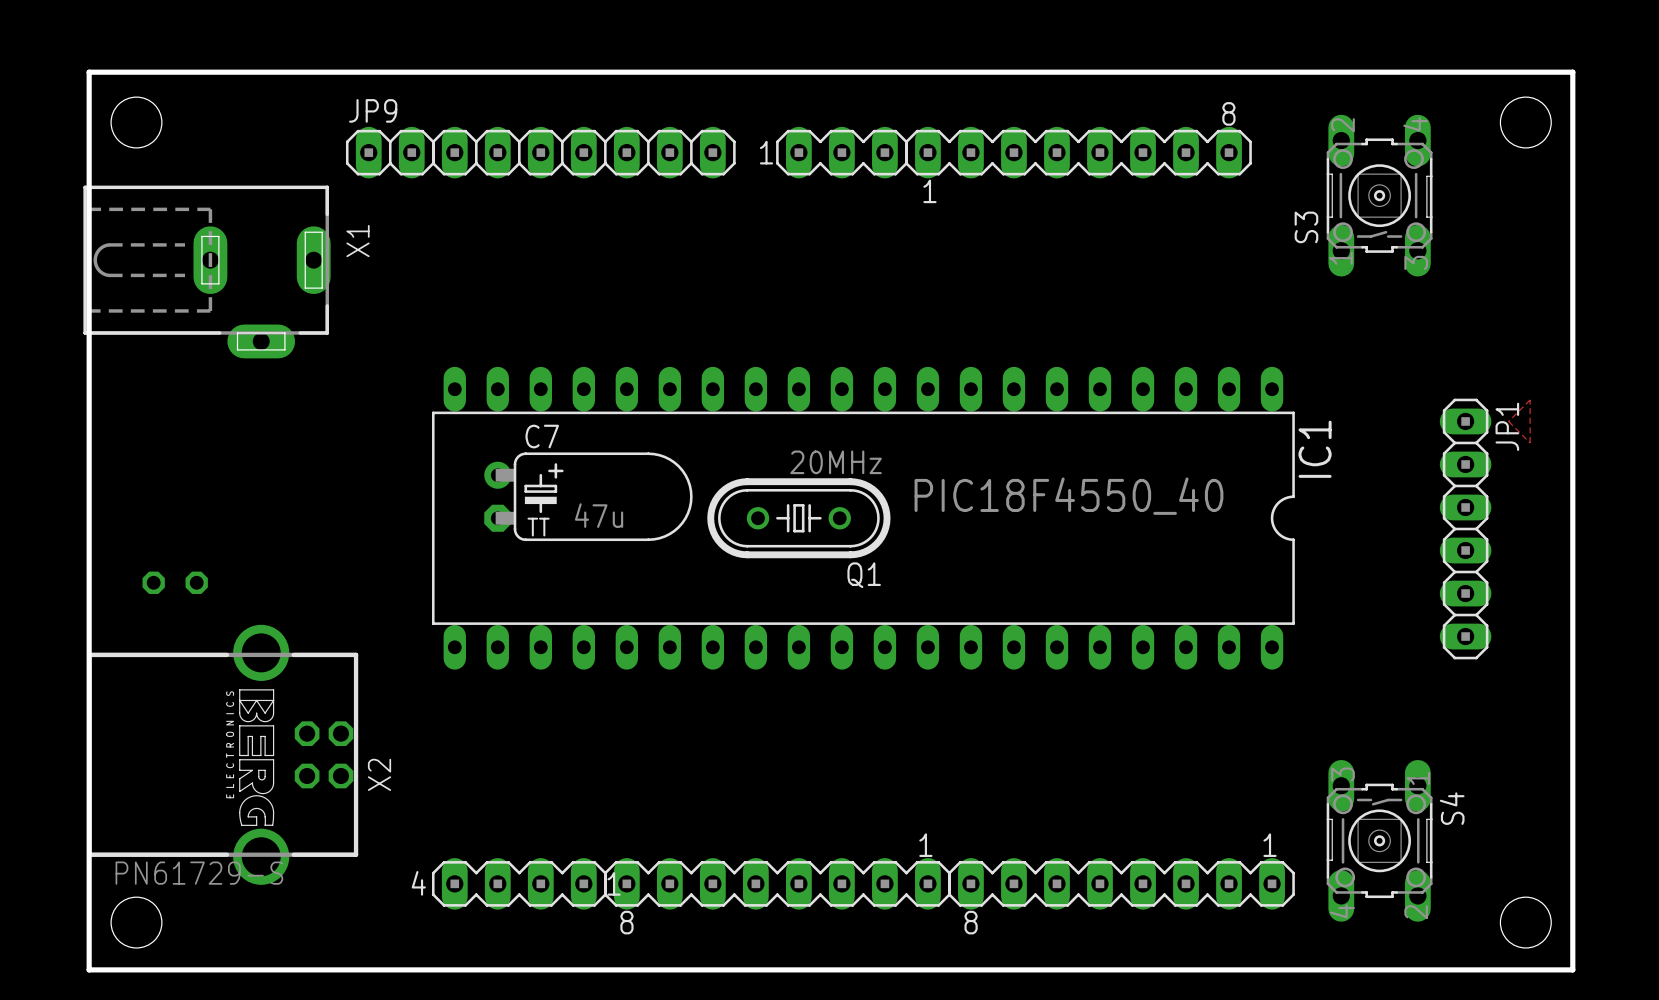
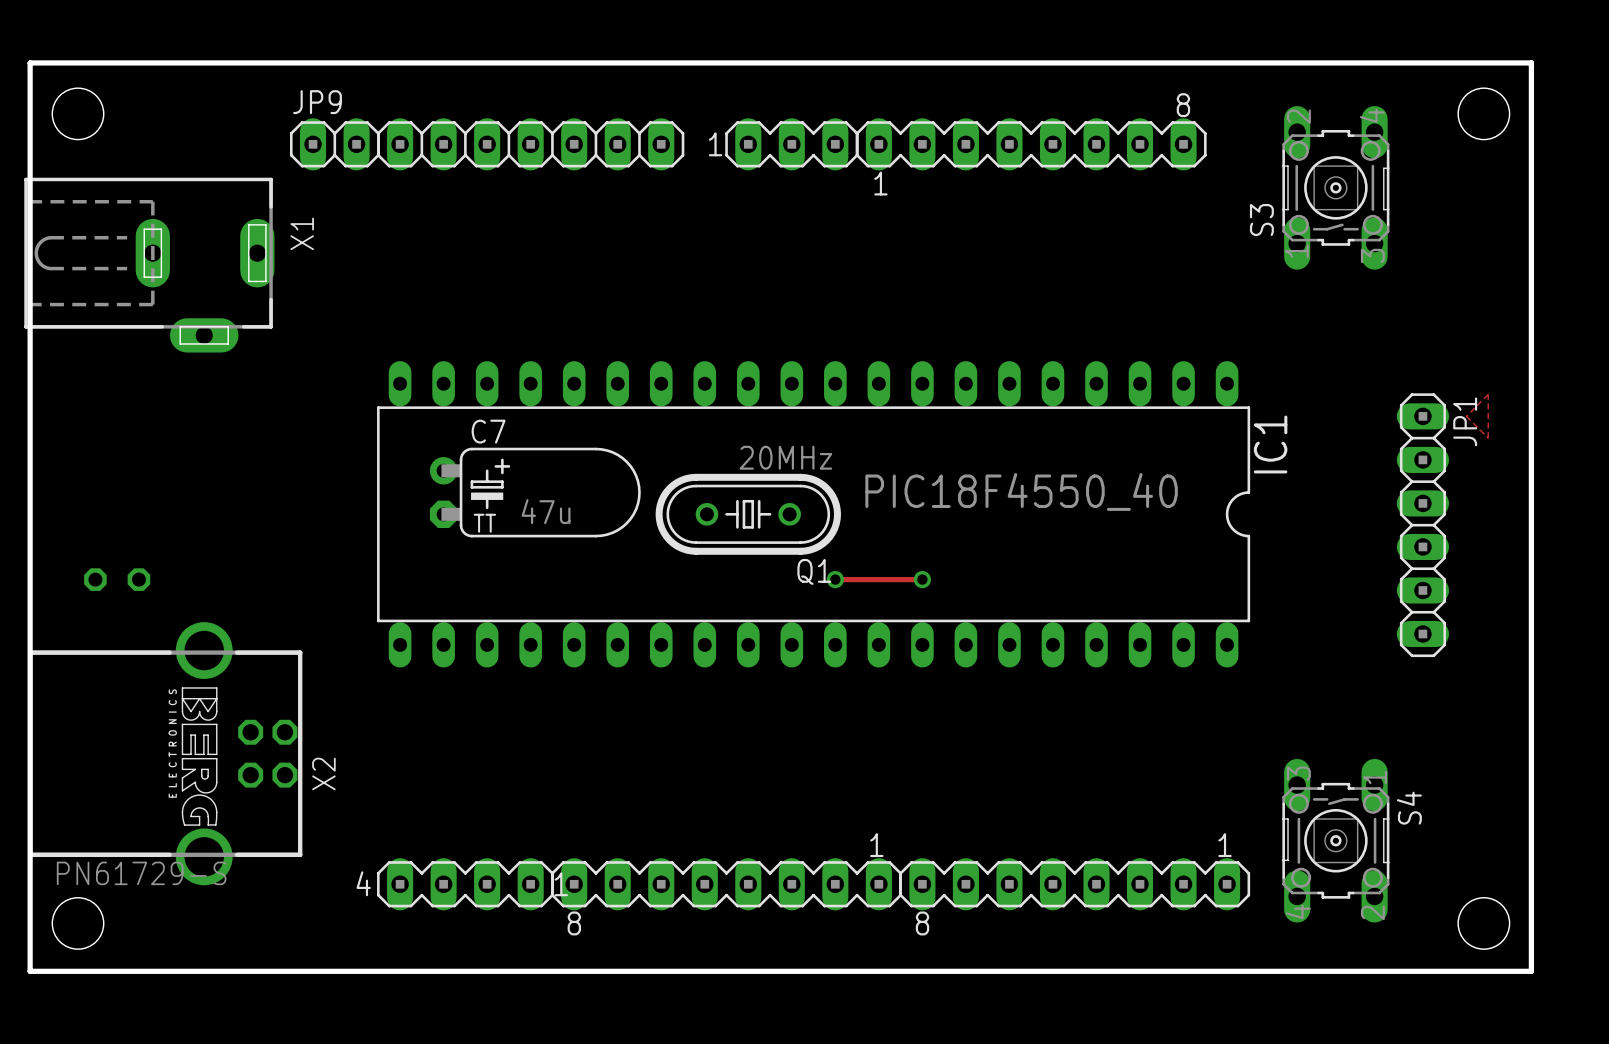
track: none -> (835, 579) (922, 579)
via: none -> (835, 579)
via: none -> (922, 579)

